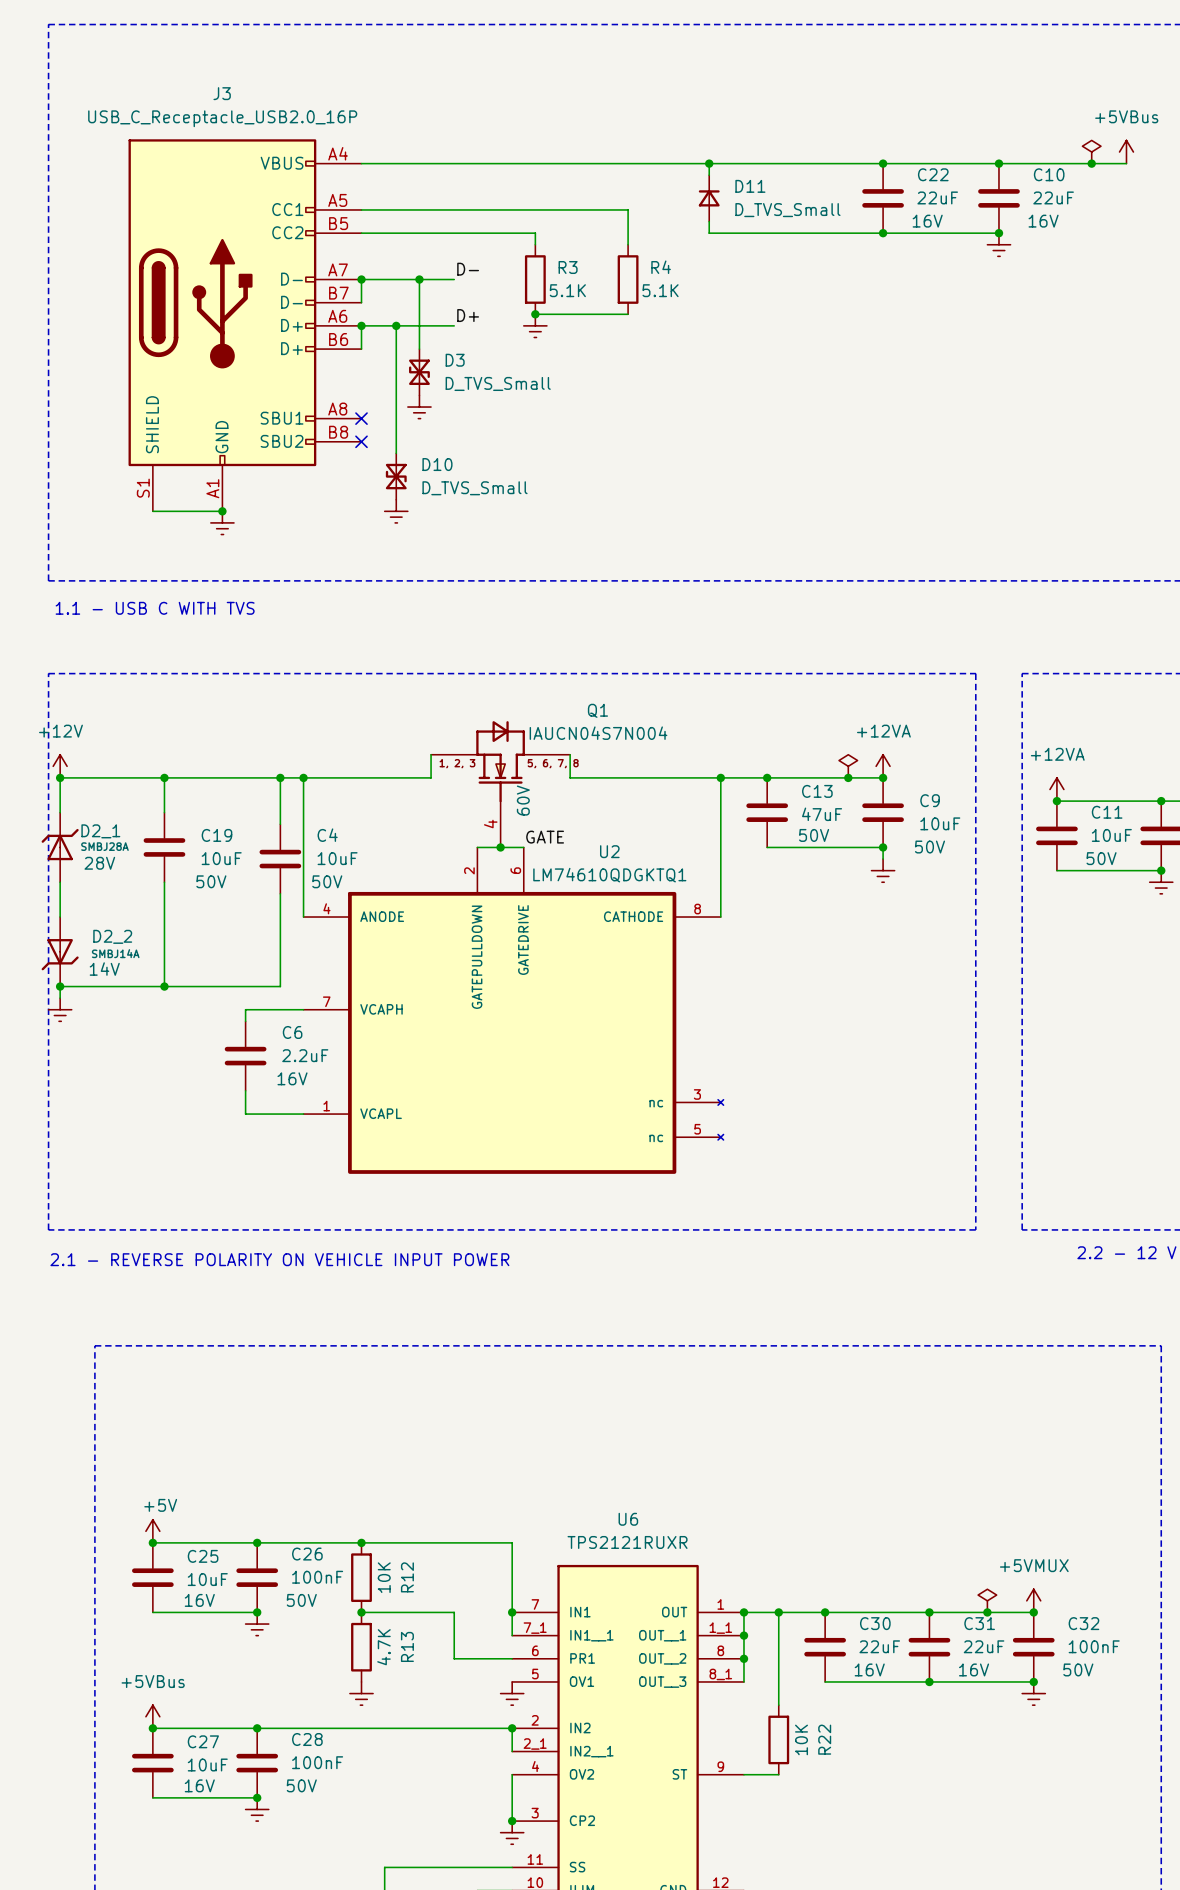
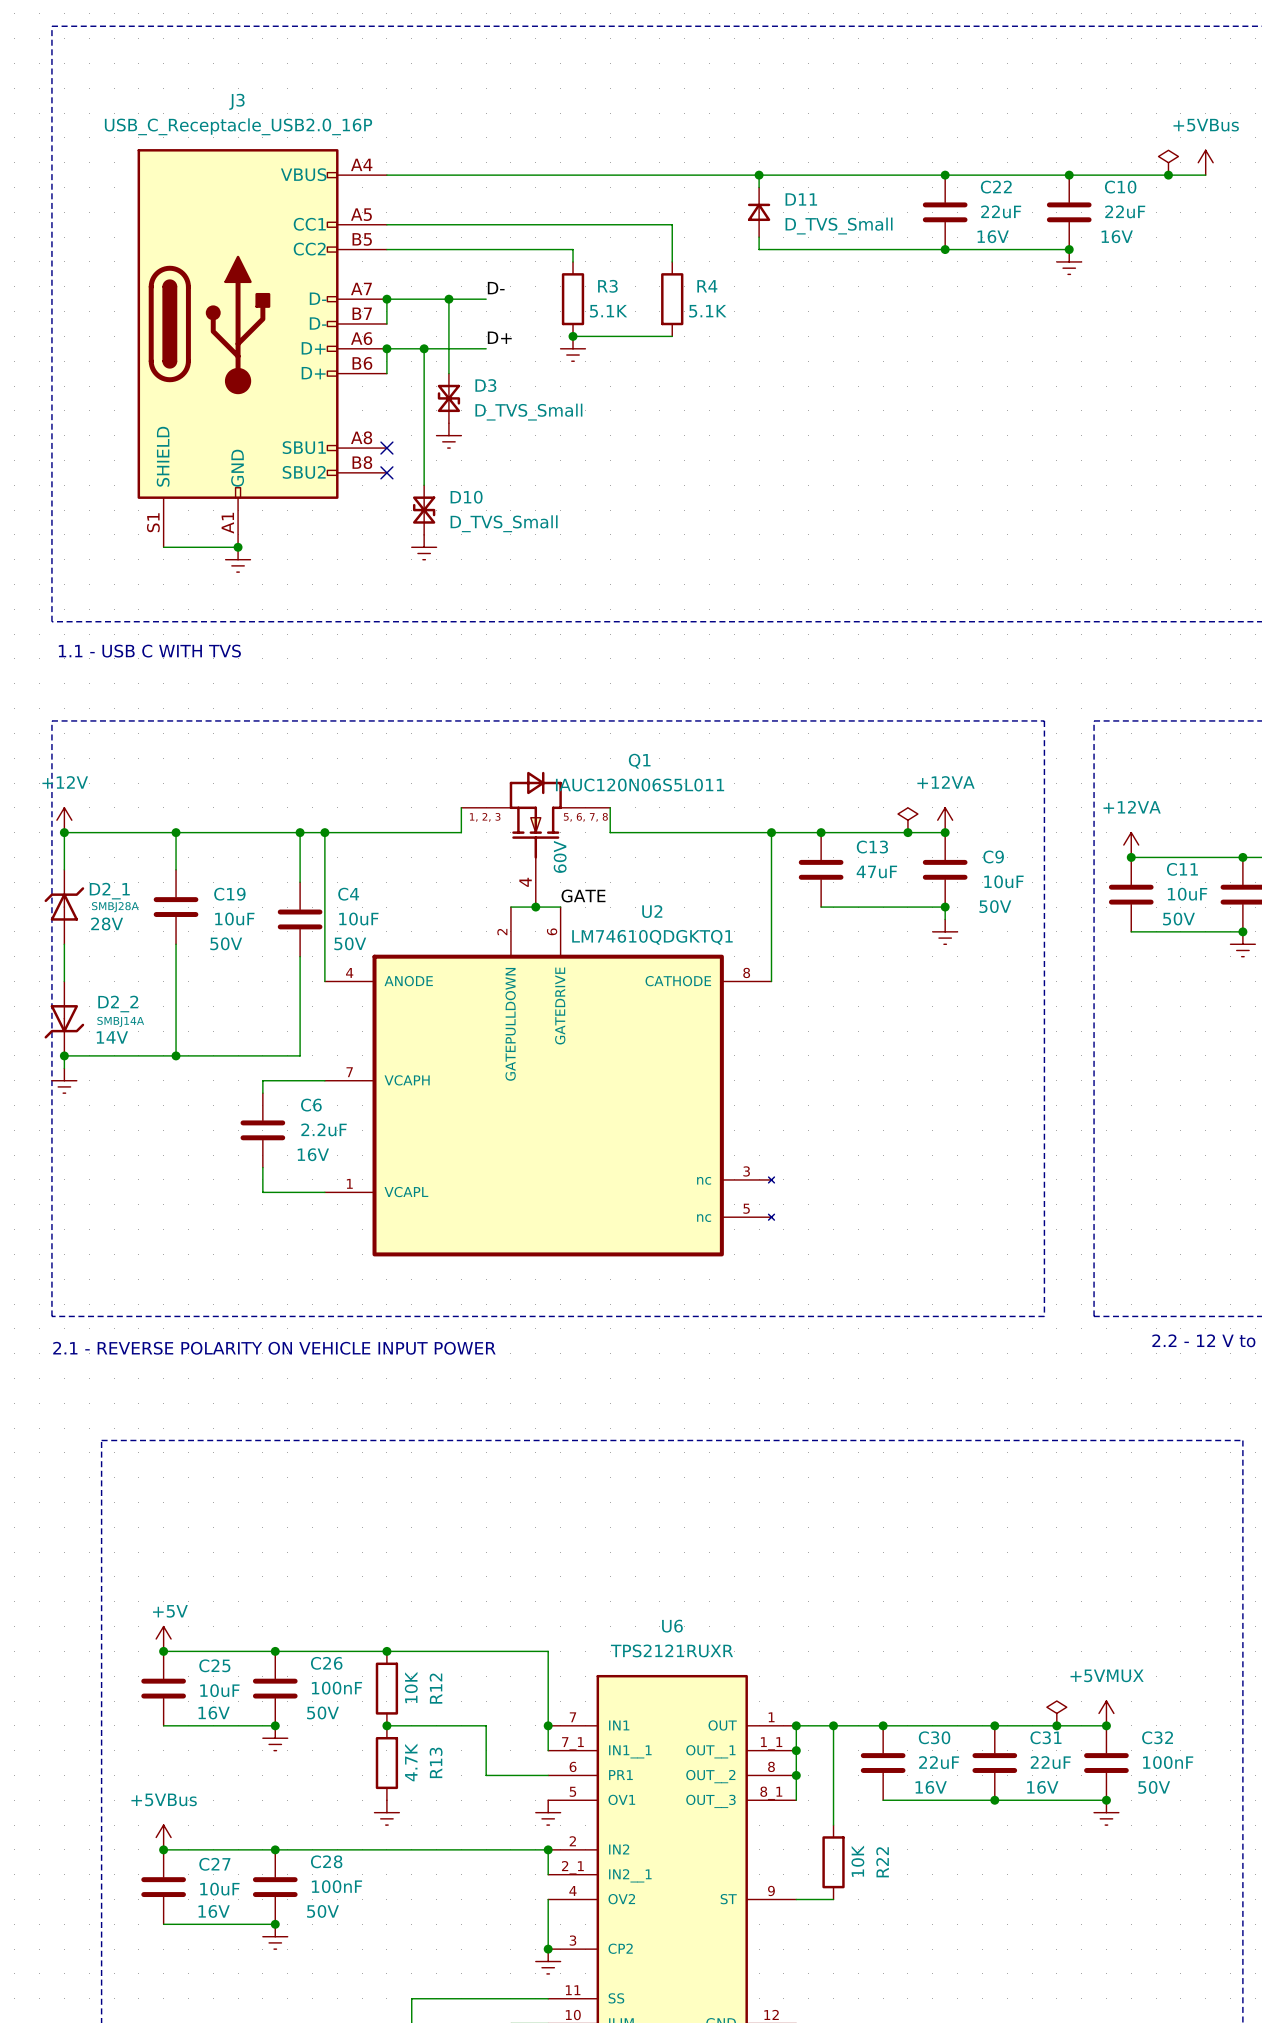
Q1 value: IAUCN04S7N004 (598, 733) -> IAUC120N06S5L011 (640, 785)
C13 text: 50V (814, 835) -> none

